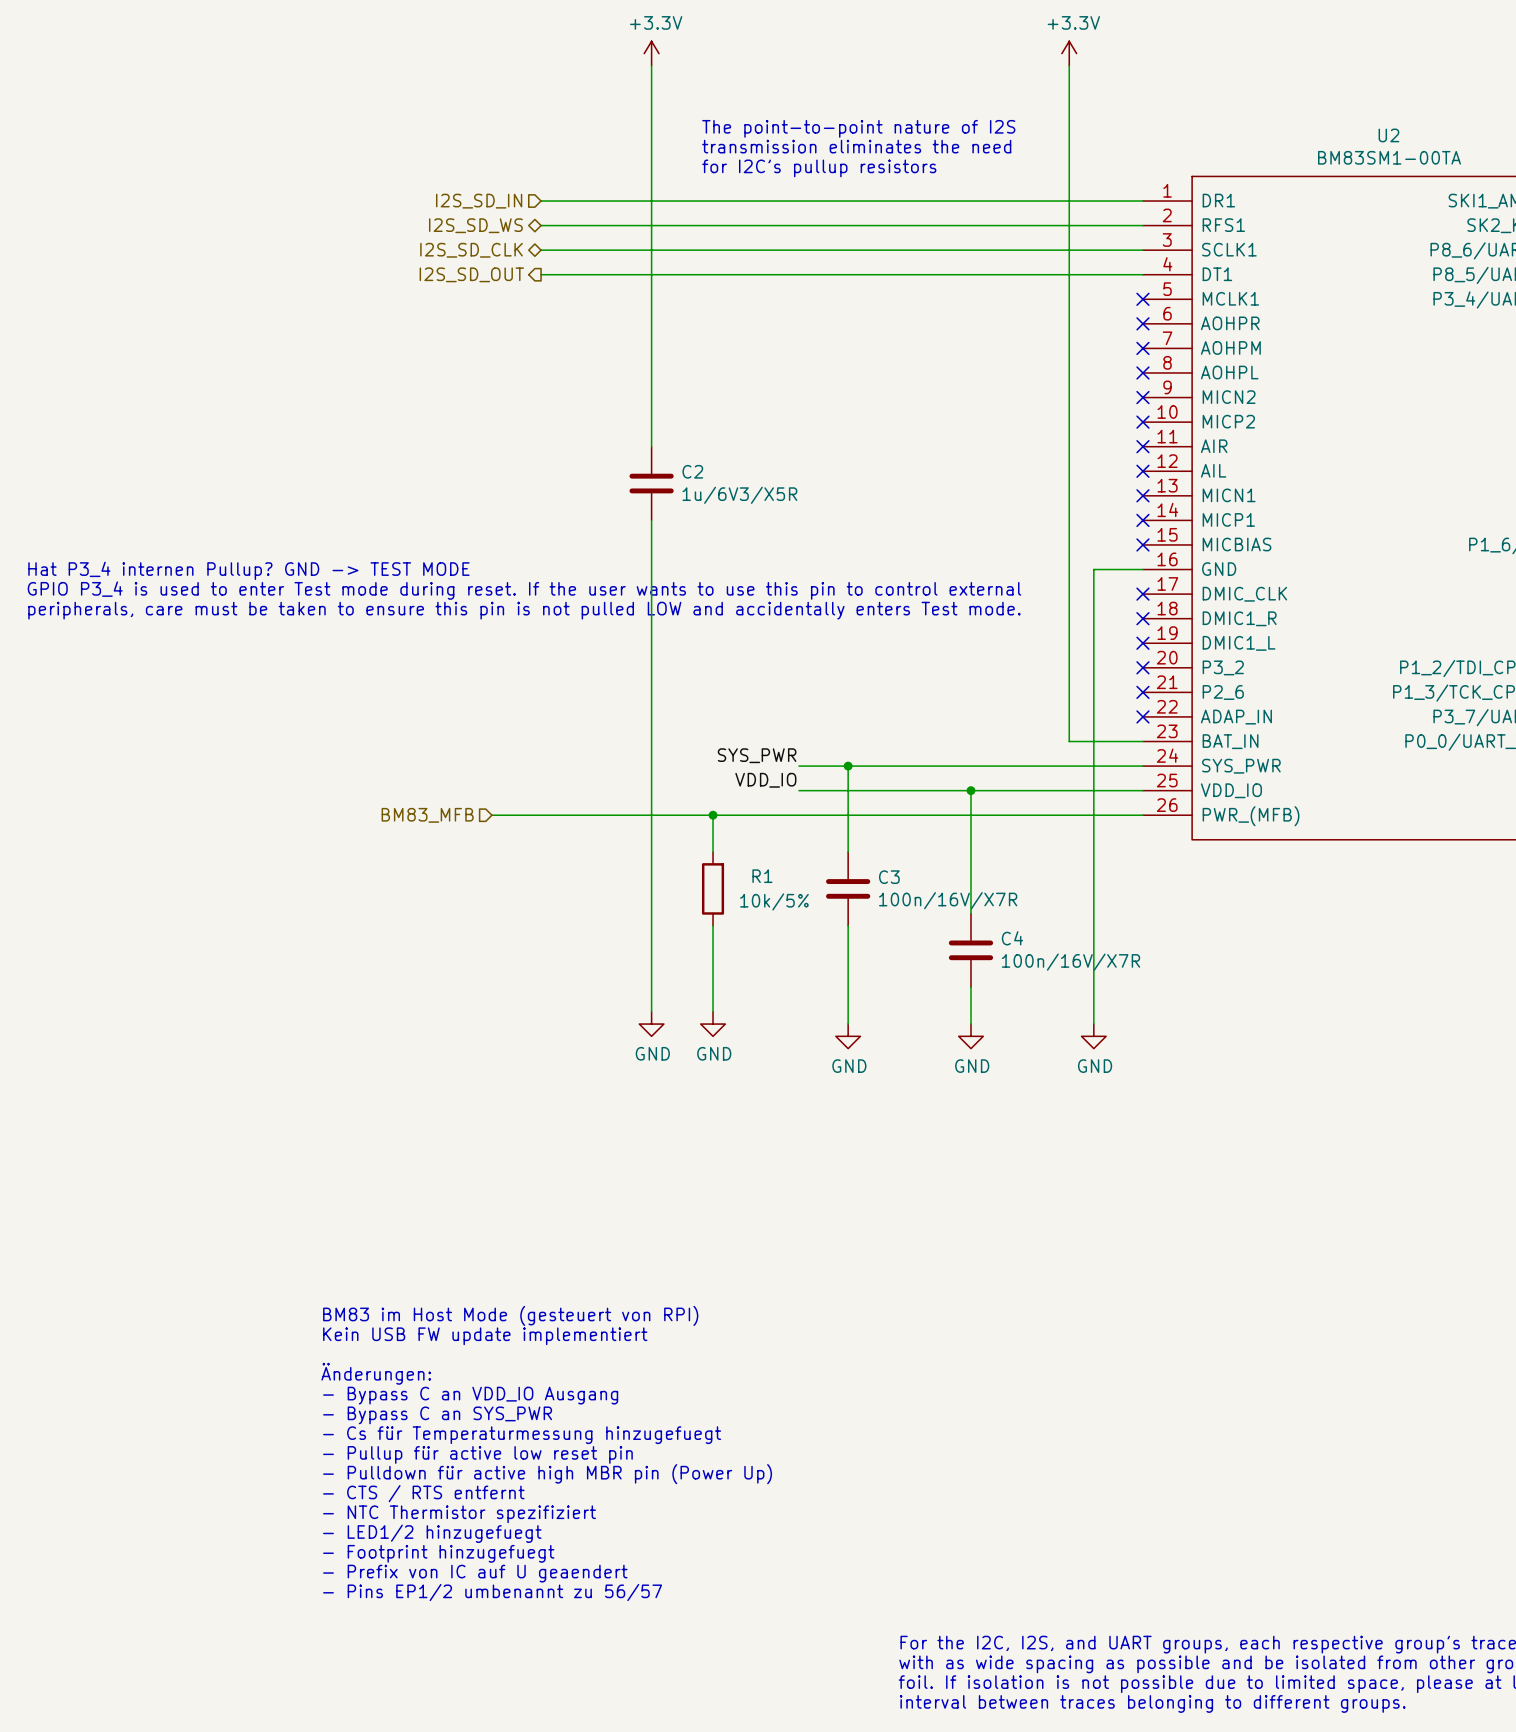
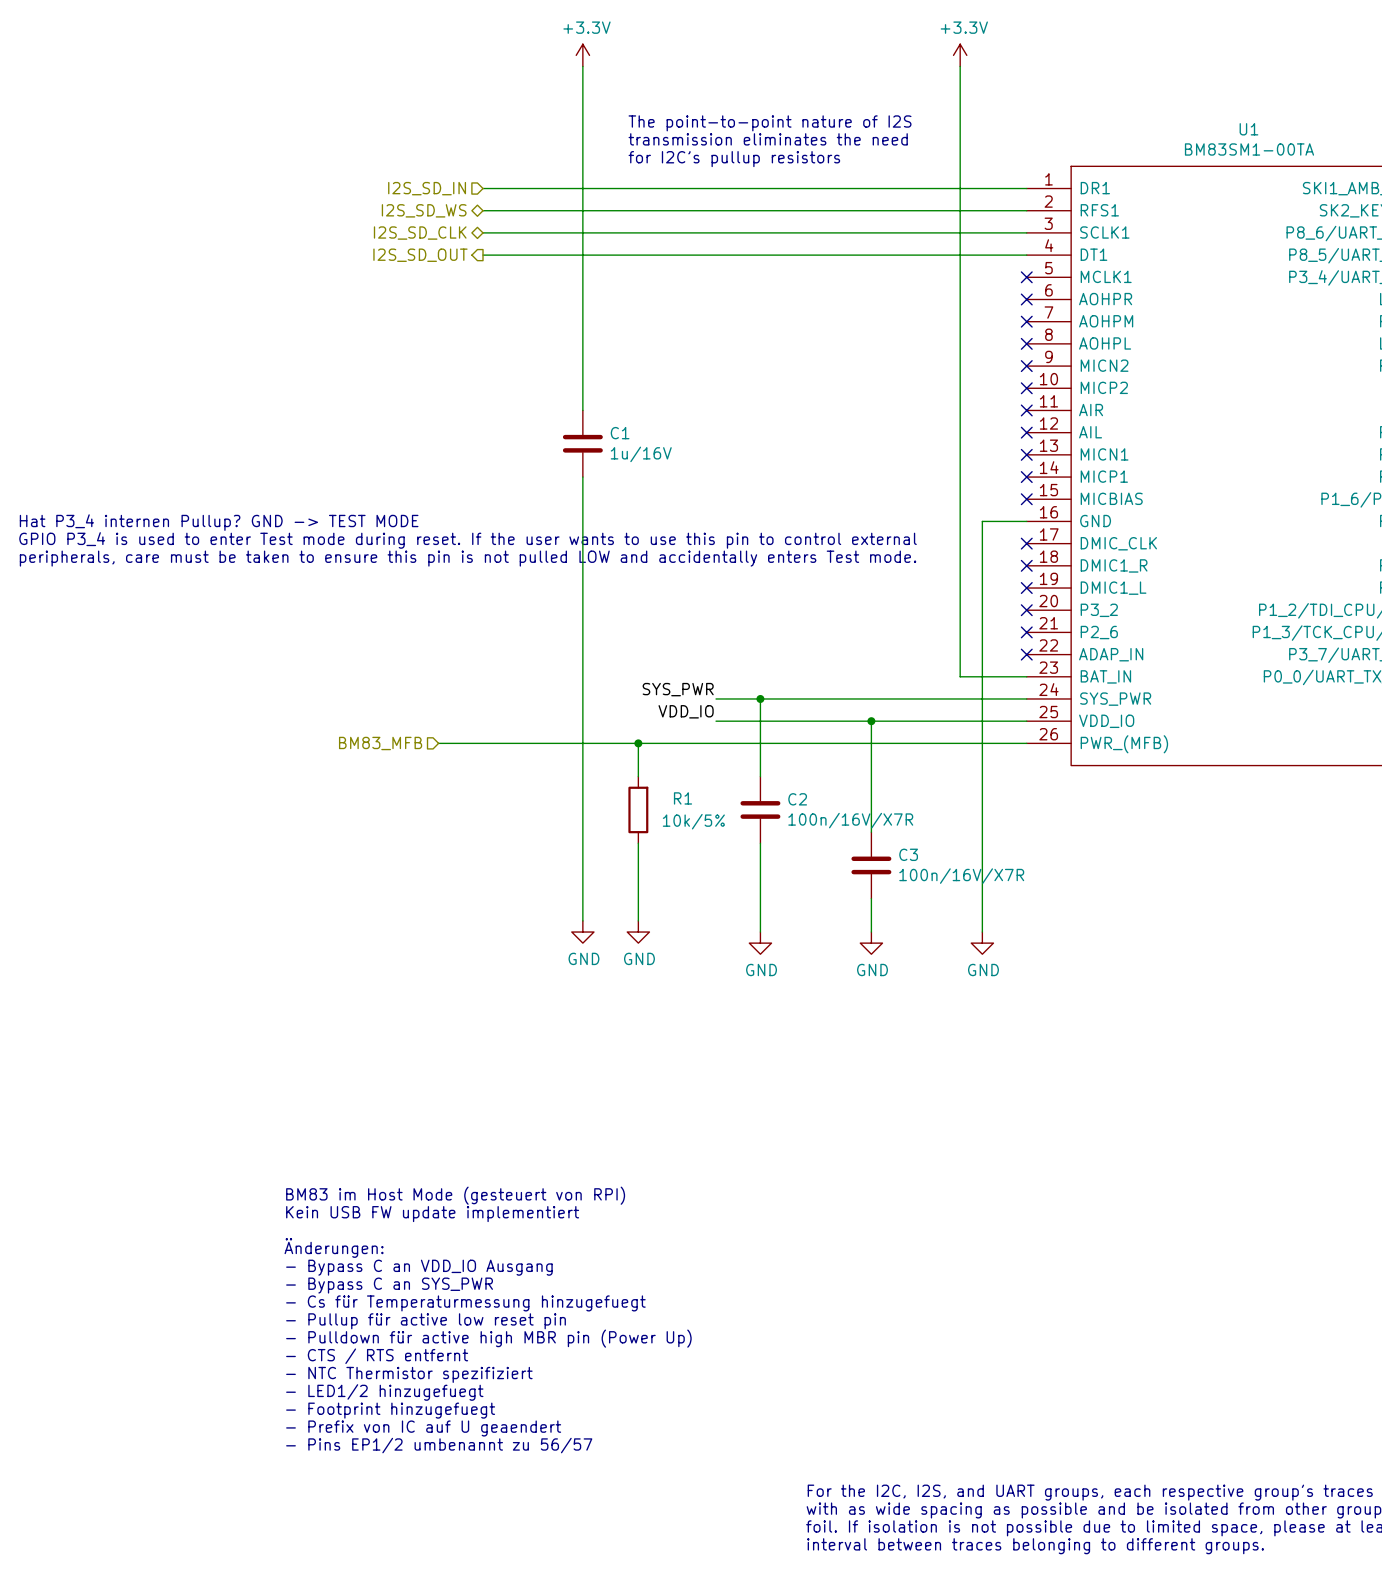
U2 name: U2 (1388, 135) -> U1 (1248, 129)
C2 name: C2 (692, 471) -> C1 (620, 433)
C2 value: 1u/6V3/X5R (739, 495) -> 1u/16V (641, 454)
C3 name: C3 (889, 877) -> C2 (797, 799)
C4 name: C4 (1012, 938) -> C3 (908, 854)

